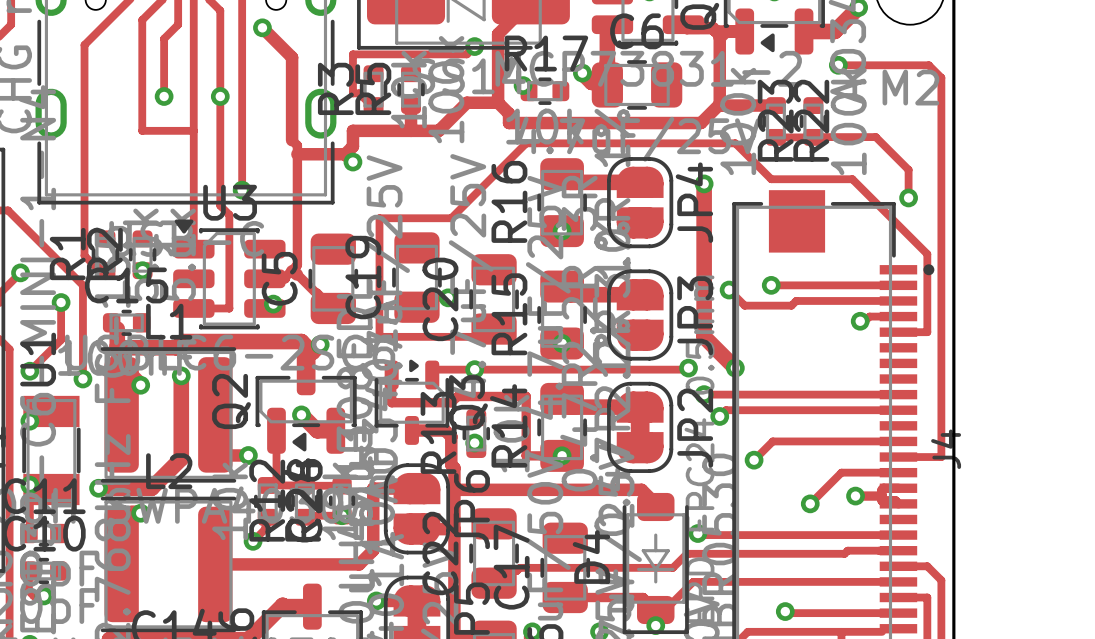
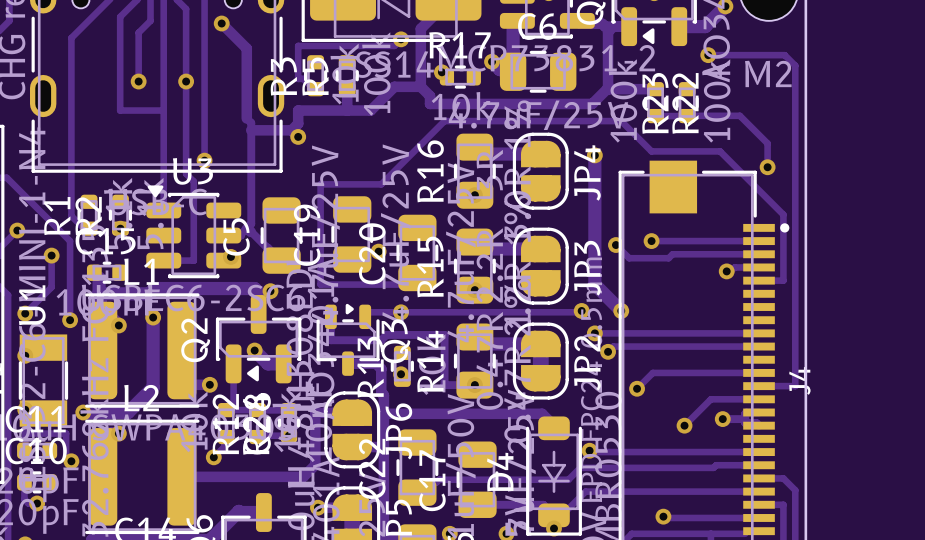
track: none -> (25, 433) (66, 433) (66, 456) (71, 461)
via: none -> (71, 461)

